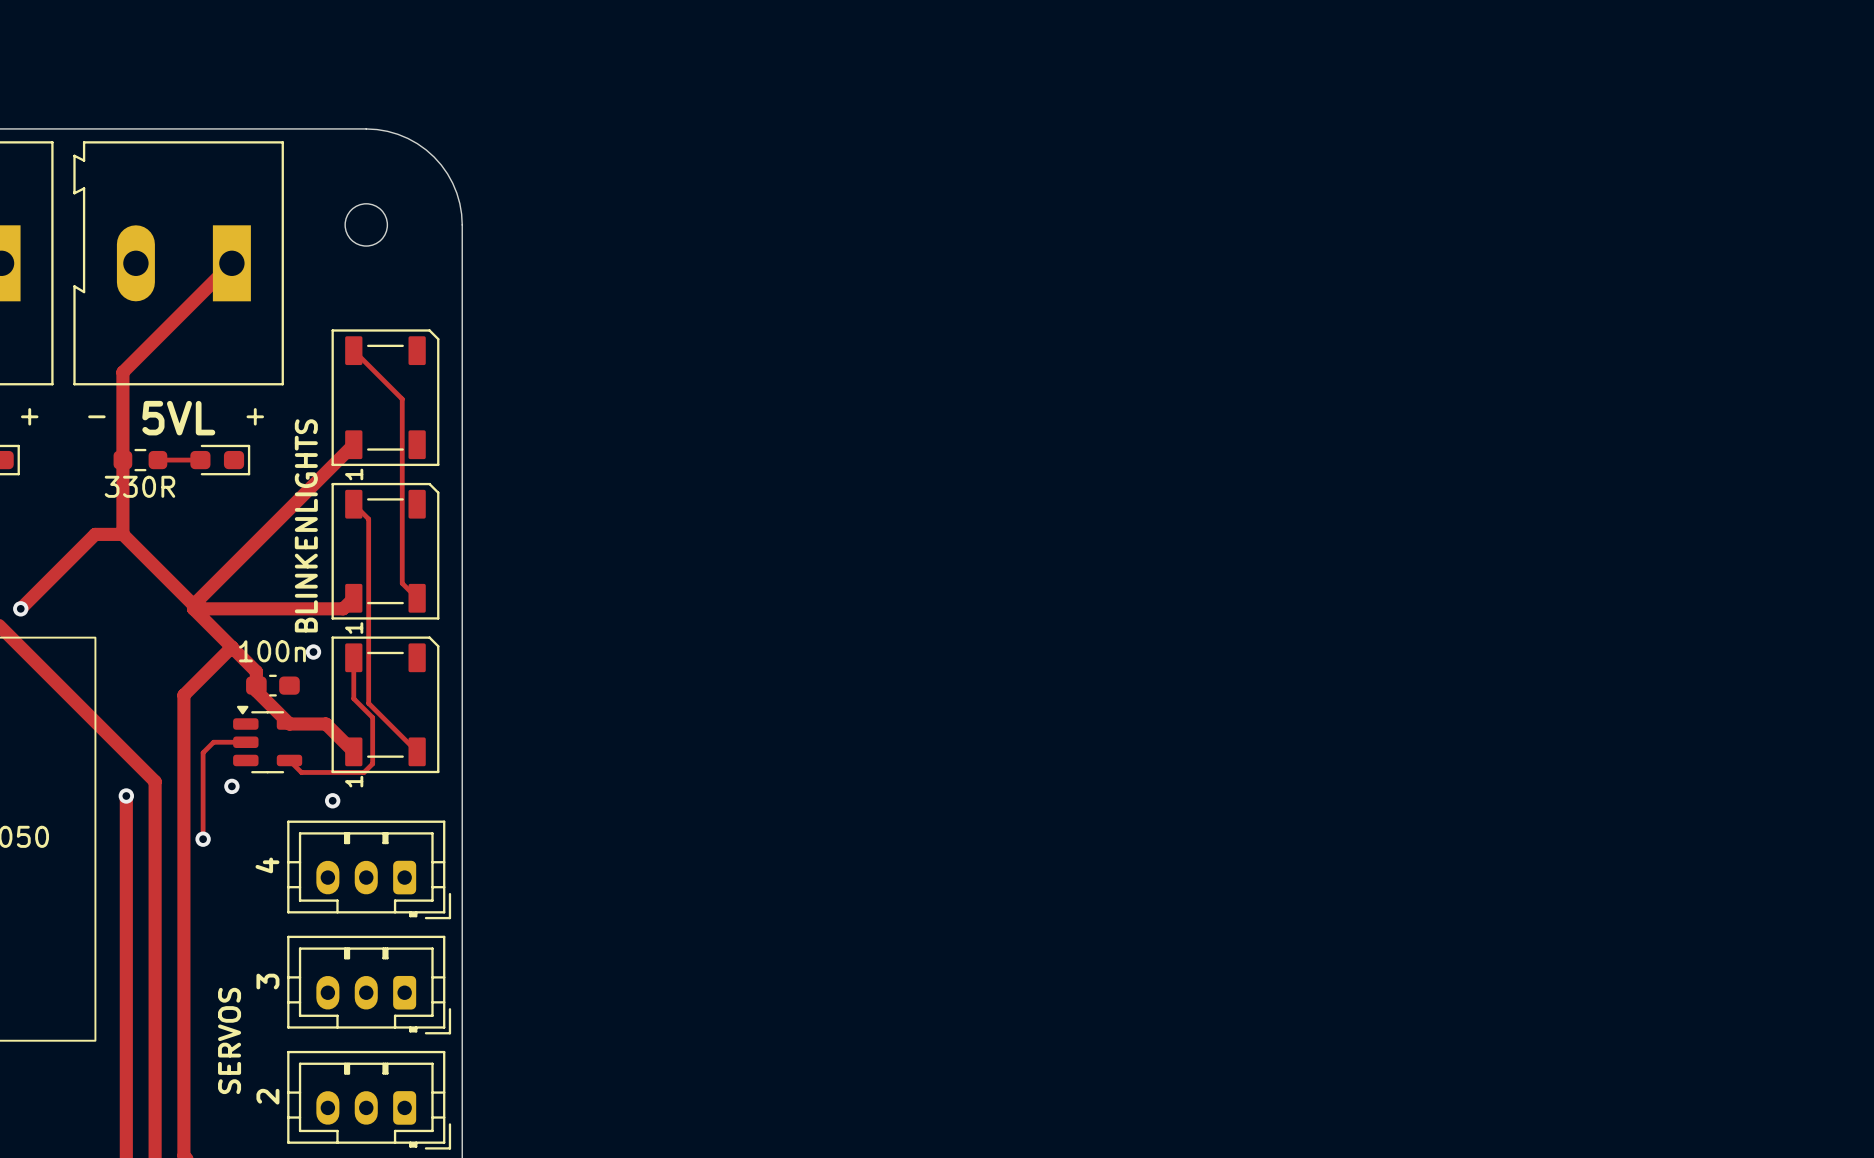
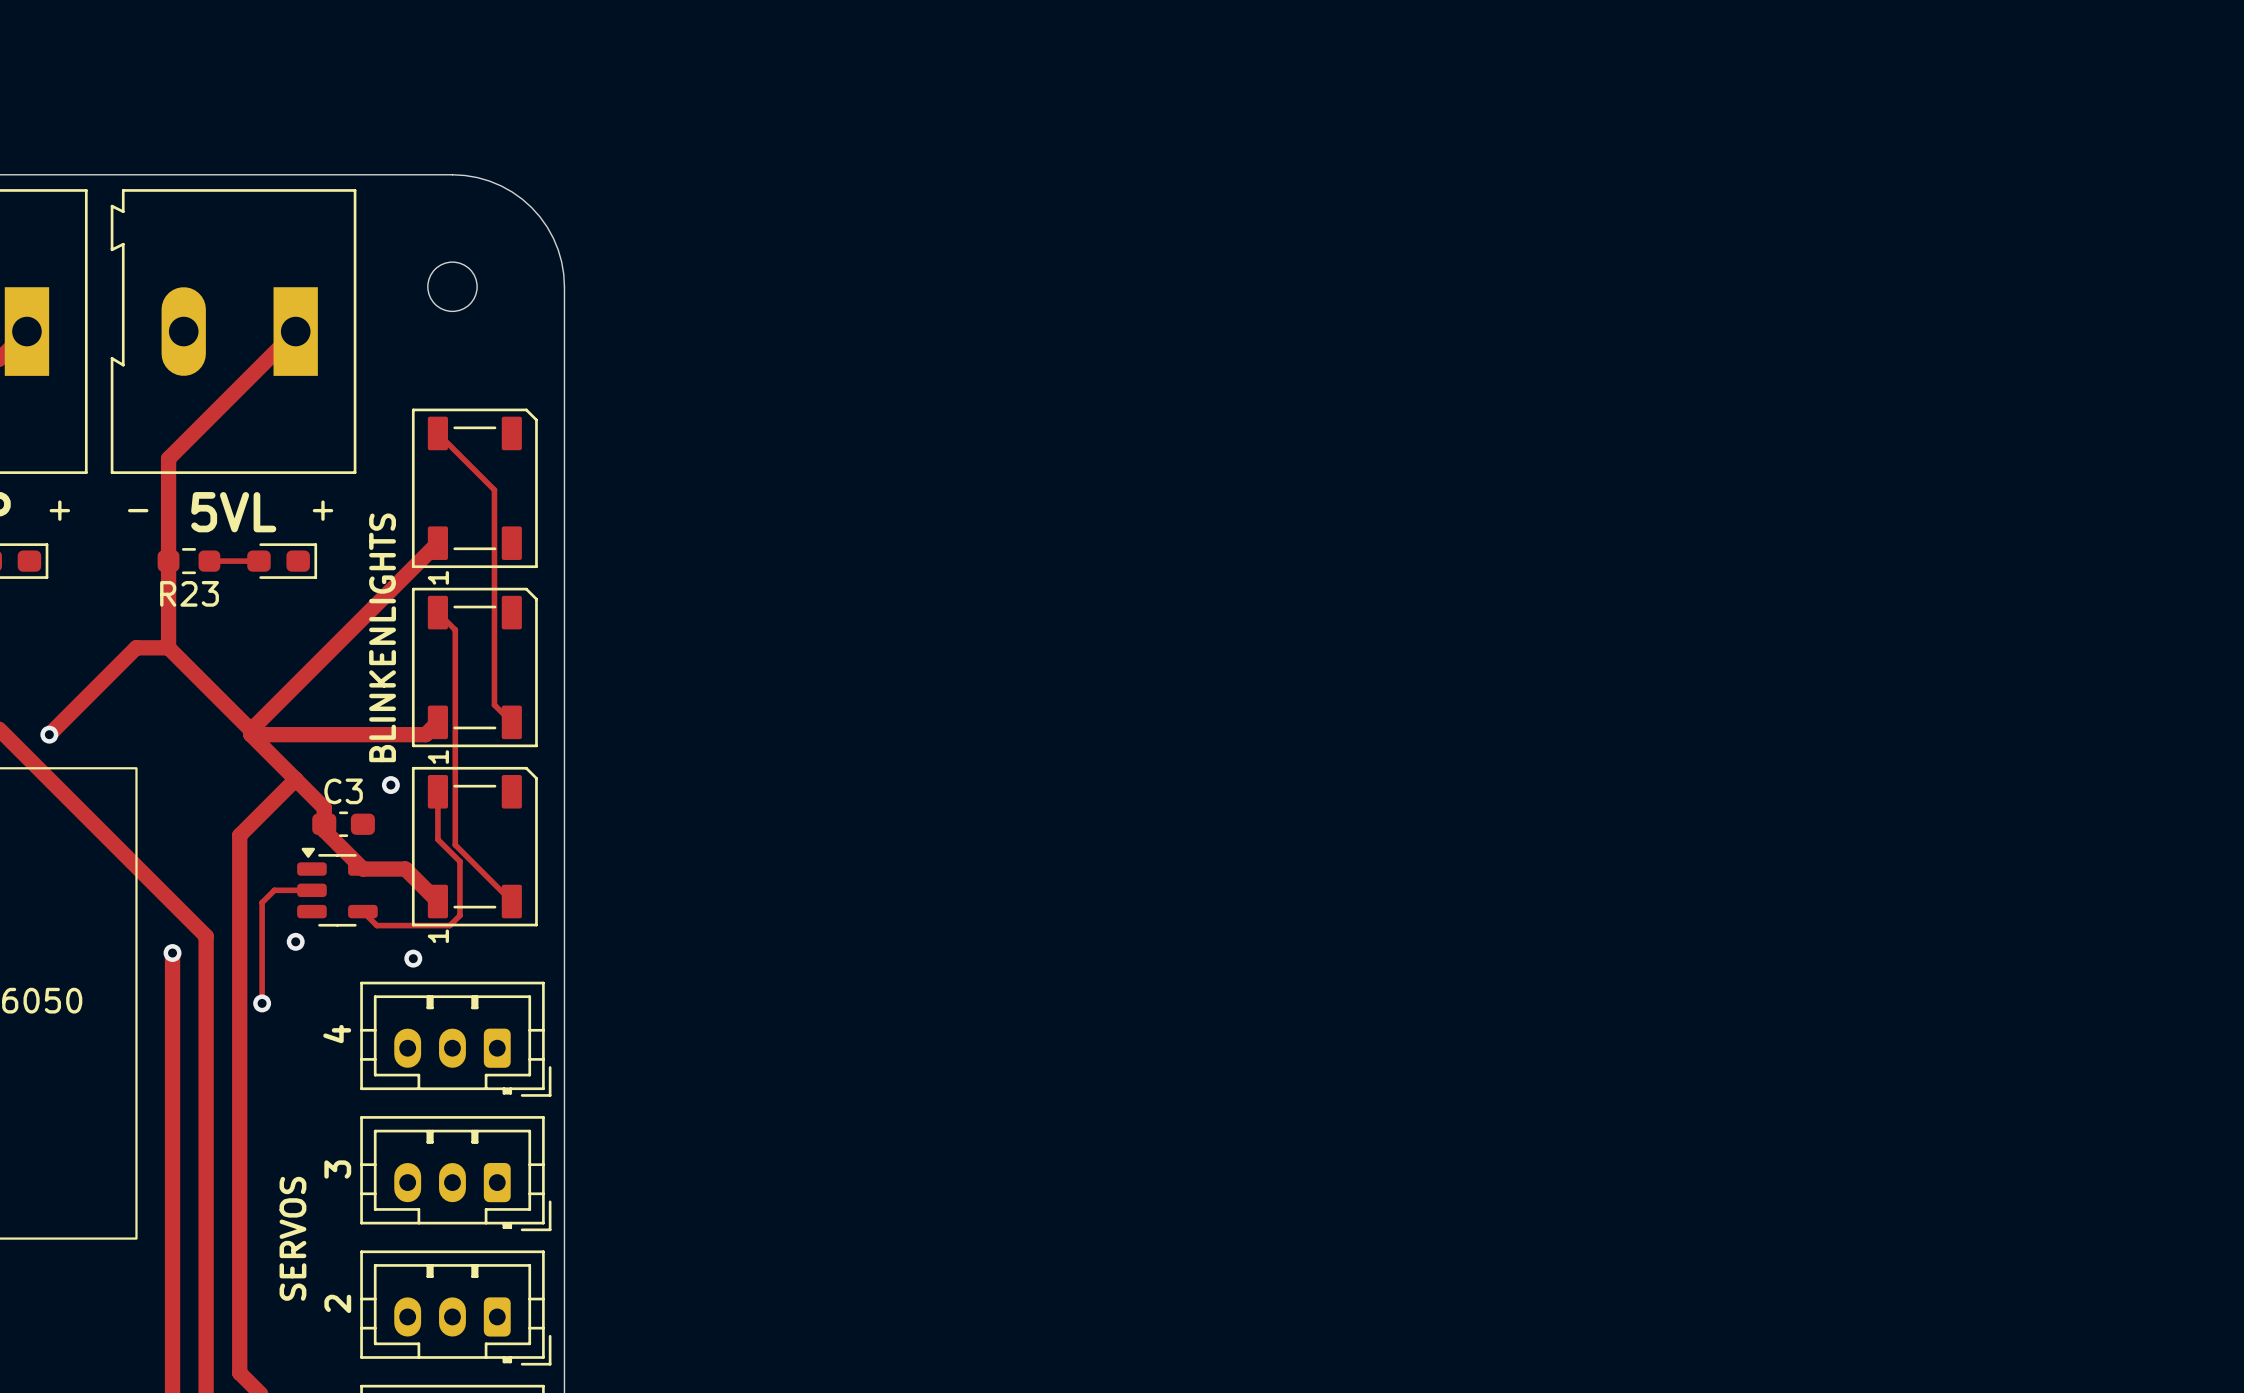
R23 value: 330R (139, 486) -> none
R23 name: none -> R23 (189, 593)
C3 value: 100n (272, 651) -> none
C3 name: none -> C3 (343, 791)

